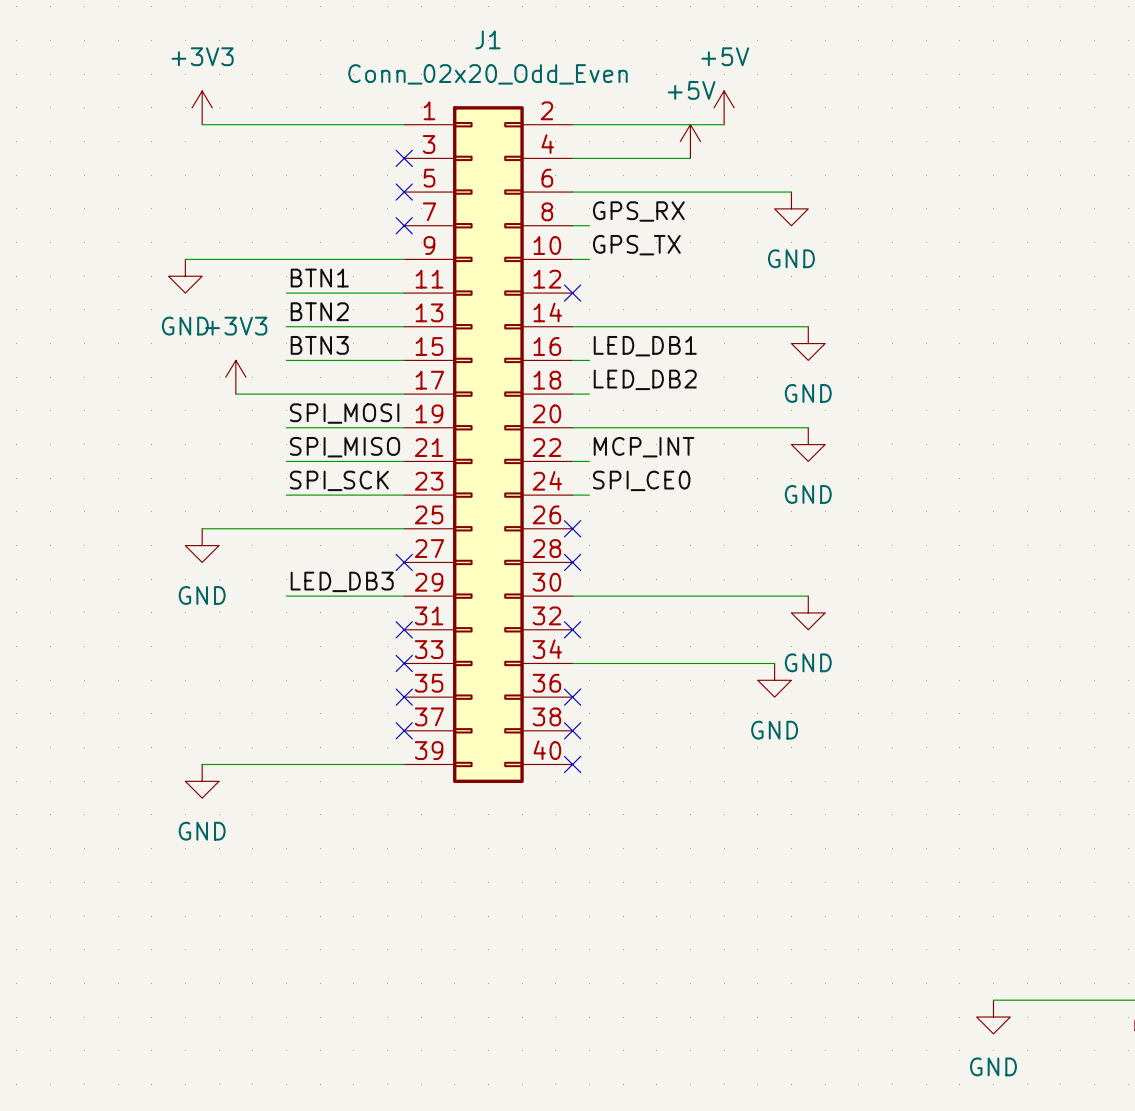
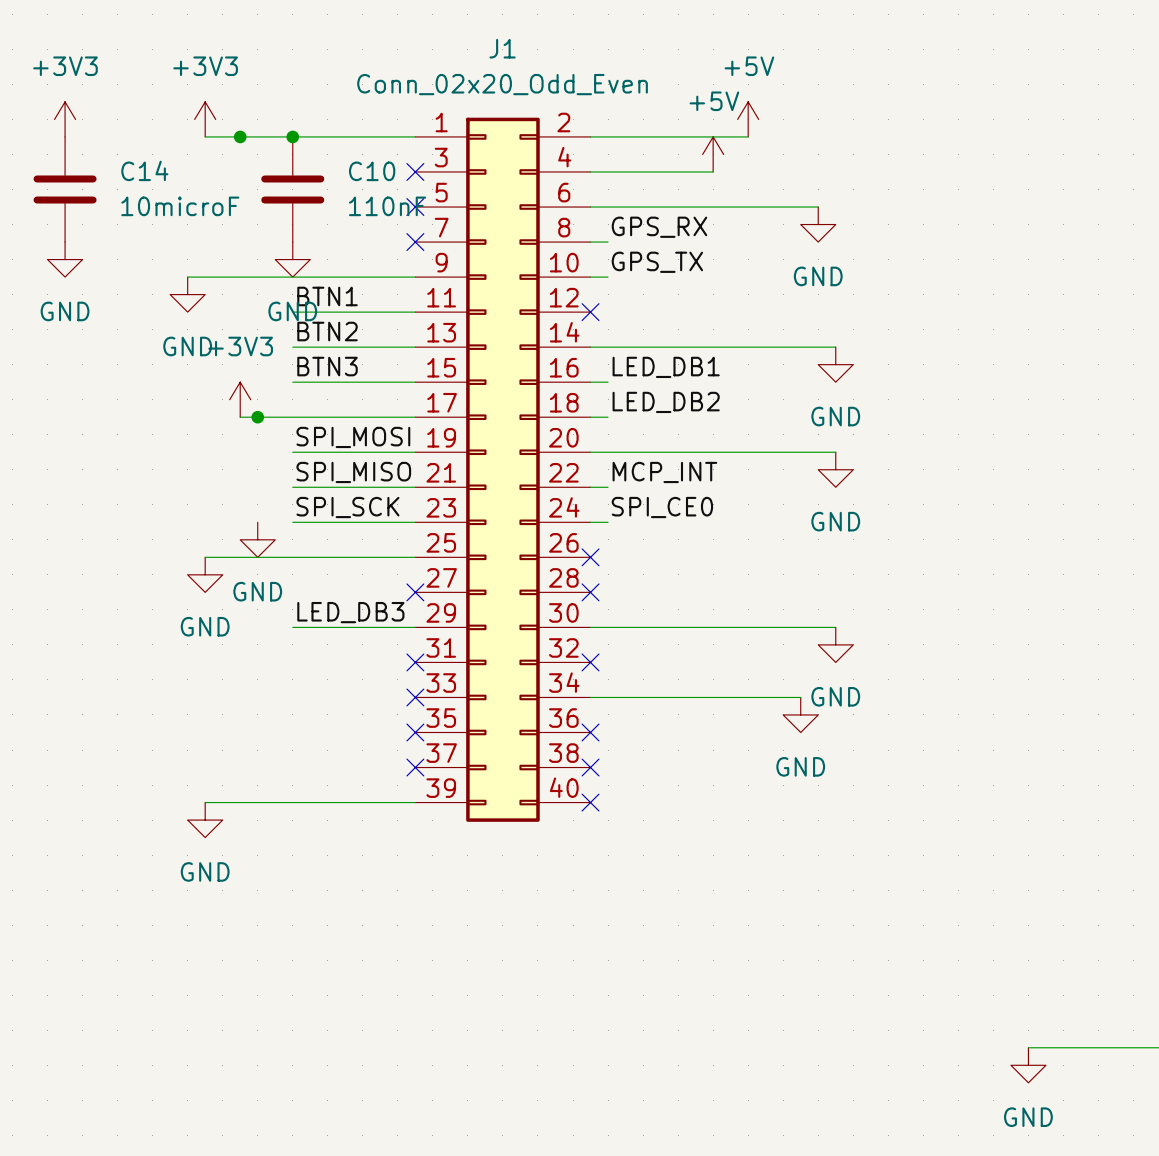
power symbol: none -> +3V3 (65, 119)
junction: none -> (240, 136)
junction: none -> (292, 136)
C14: none -> 10microF (65, 189)
C10: none -> 110nF (292, 189)
power symbol: none -> GND (65, 259)
power symbol: none -> GND (292, 259)
junction: none -> (257, 417)
power symbol: none -> GND (257, 539)

